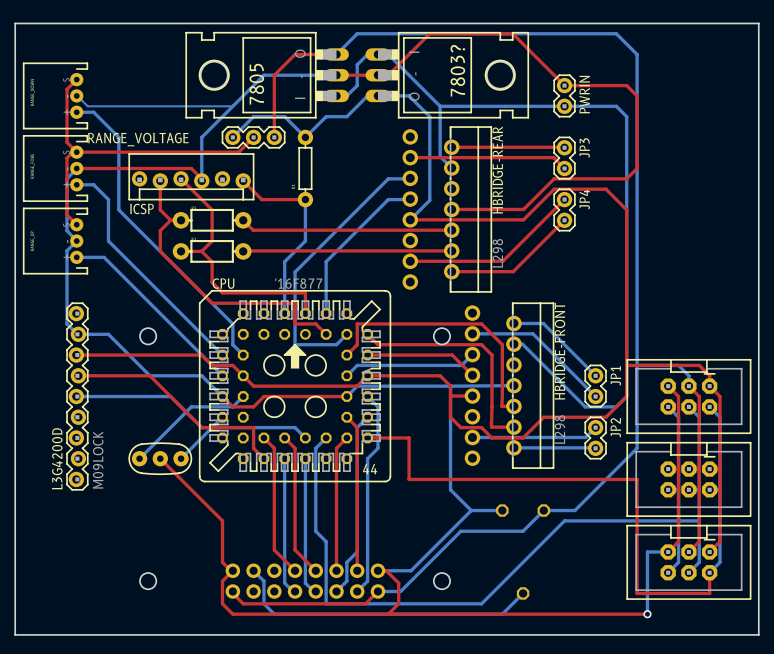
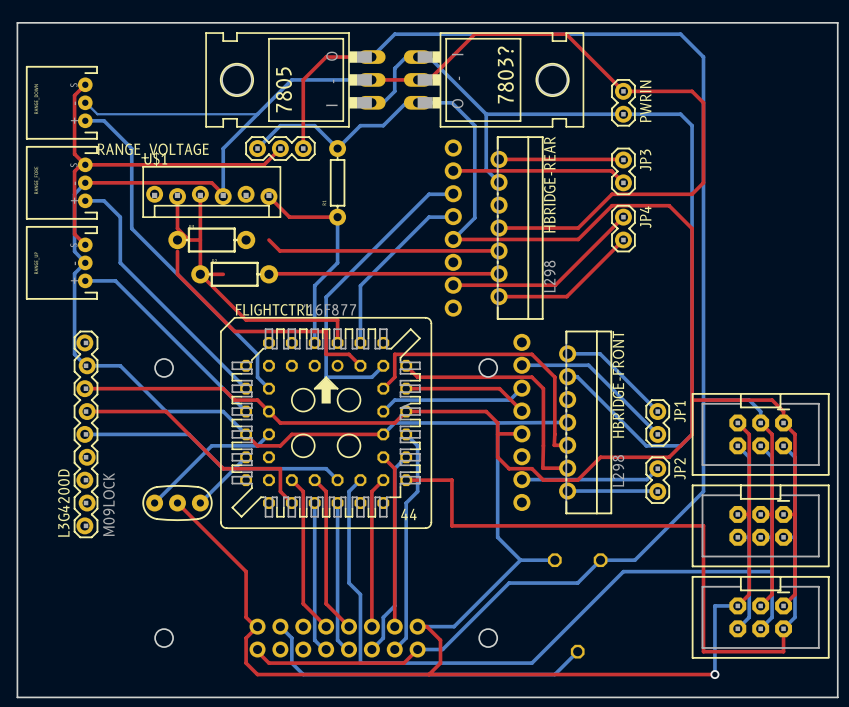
top track: (181, 178) (212, 209) (212, 241) (201, 251) (212, 261) (212, 282) -> (200, 194) (200, 274) (234, 308)
ICSP name: ICSP (141, 208) -> U$1 (155, 158)
top track: (170, 220) (160, 230) -> none
part position: (212, 220) -> (211, 240)
CPU name: CPU (223, 283) -> FLIGHTCTRL (273, 309)

